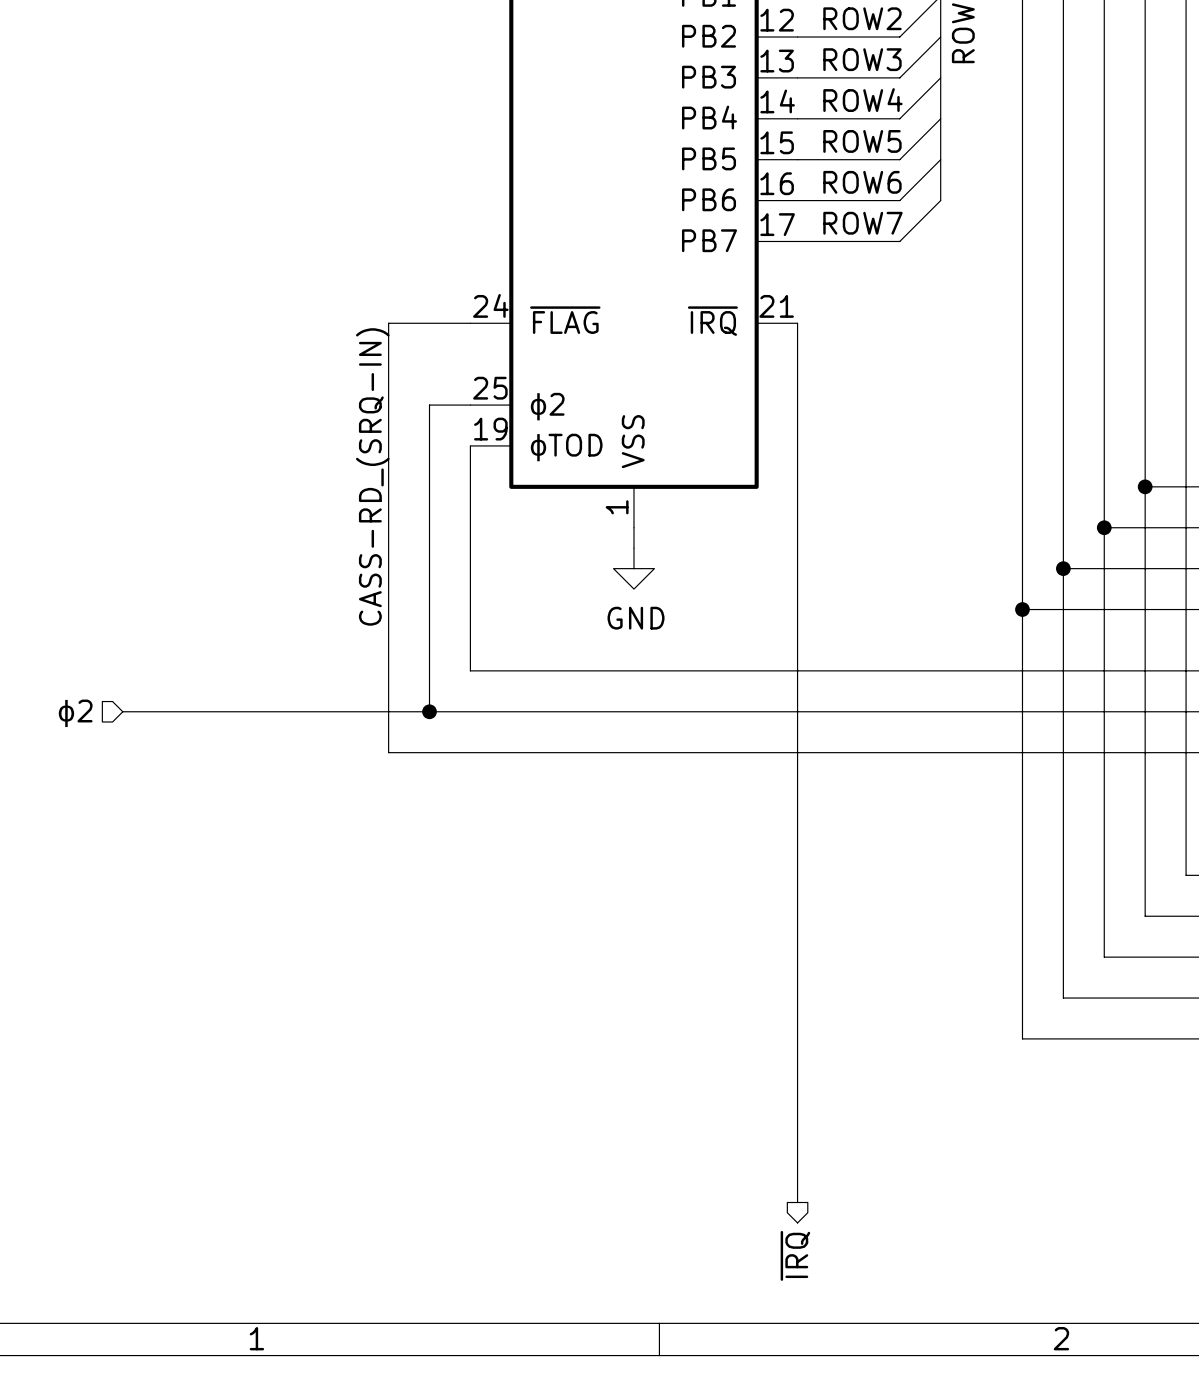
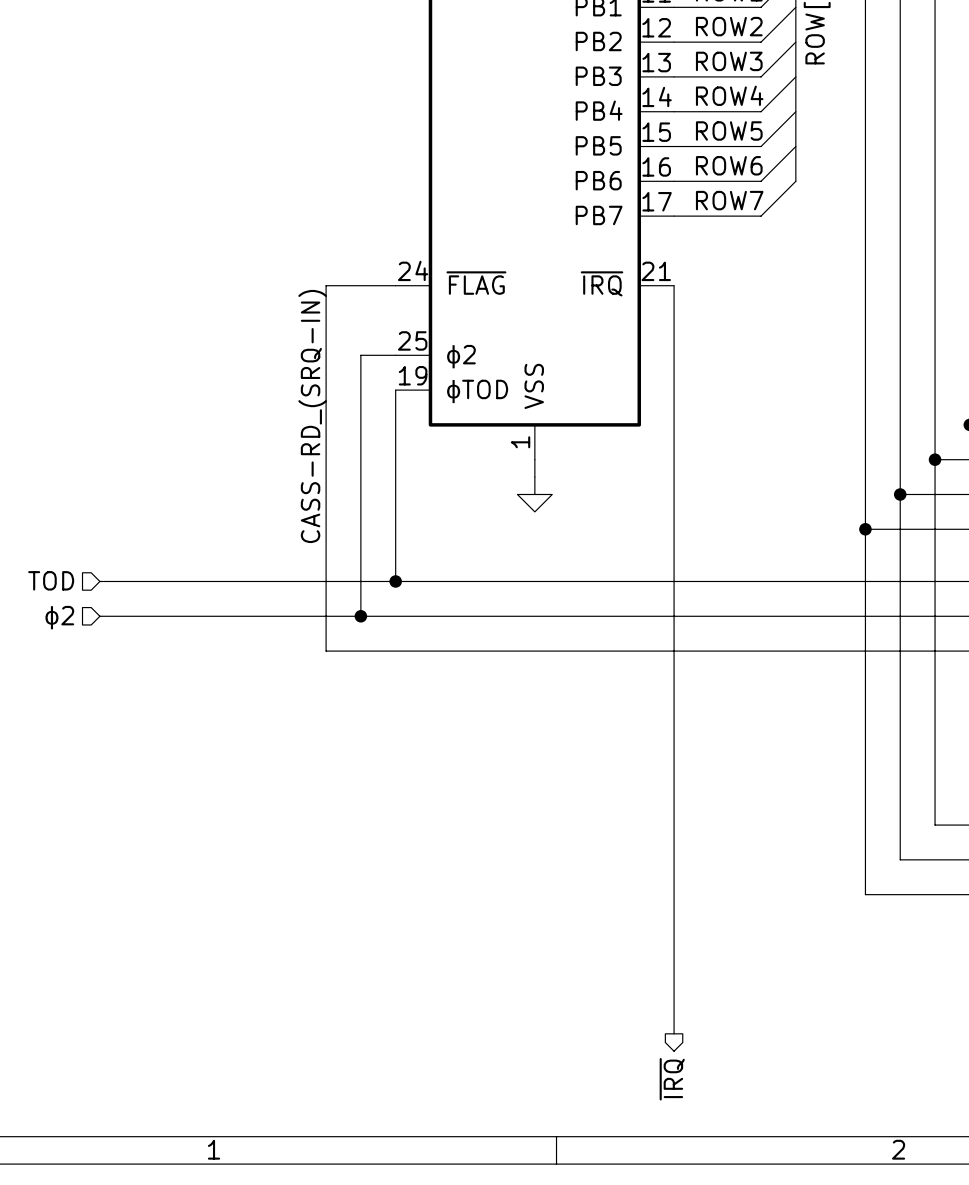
power symbol text: GND (636, 618) -> none
hierarchical label: none -> TOD (51, 580)
wire: none -> (99, 581) (395, 581)
junction: none -> (395, 581)

